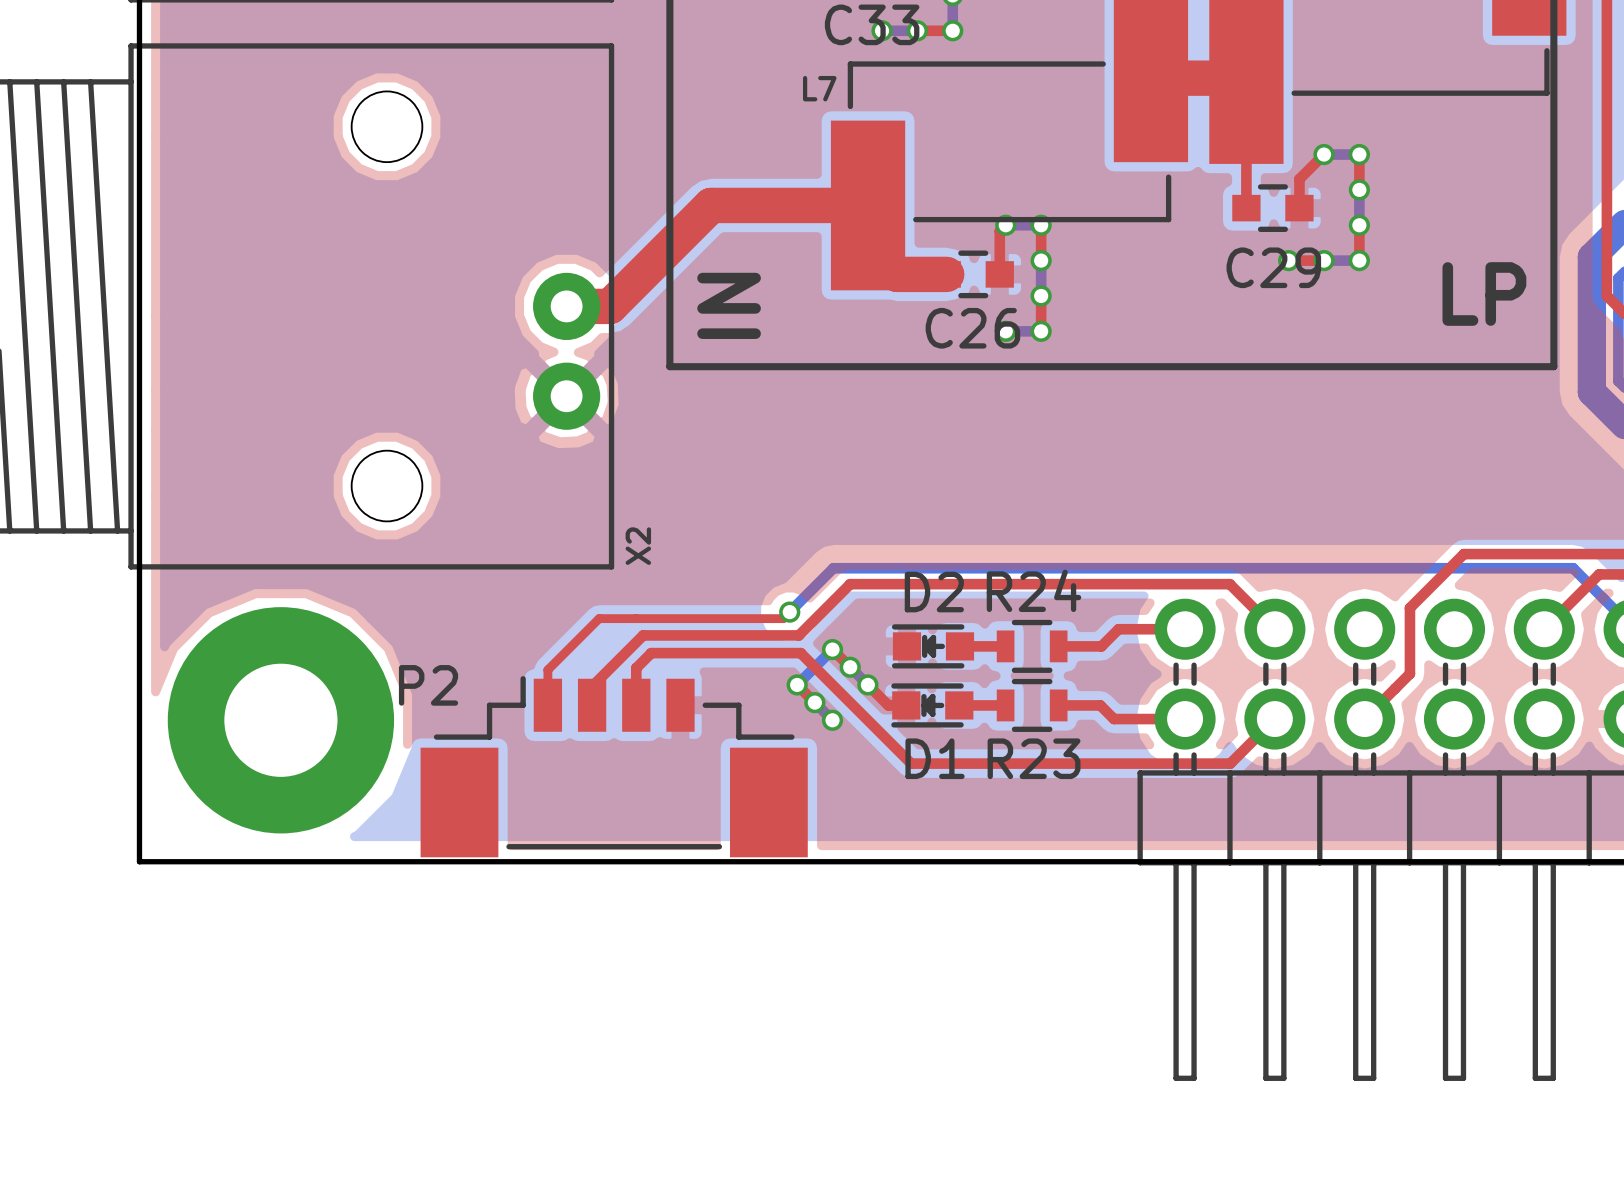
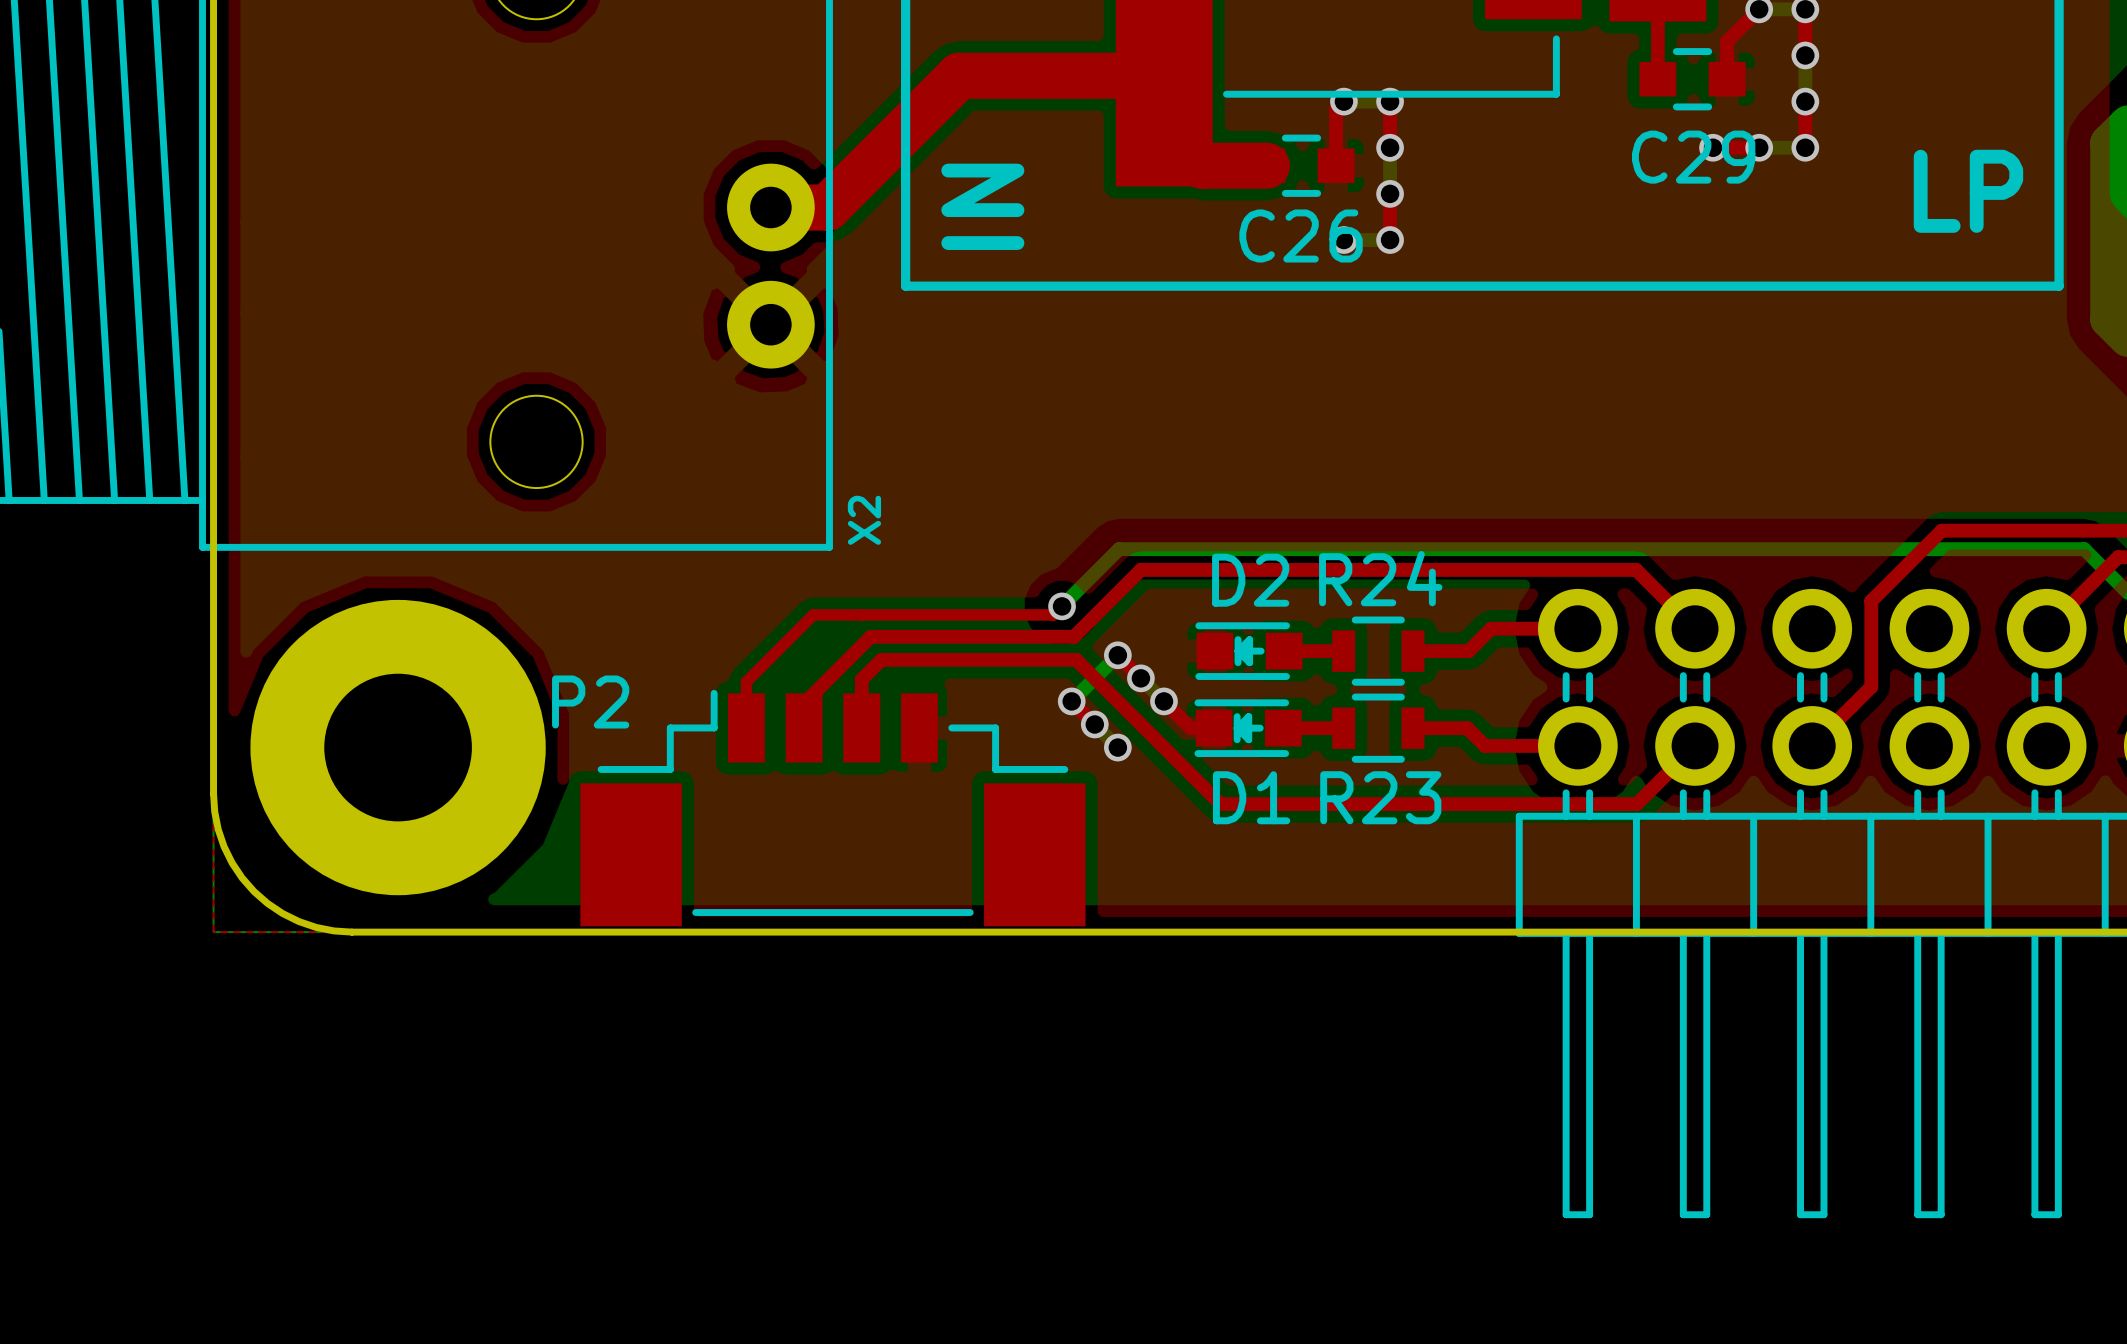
board edge: (139, 755) (139, 861) (245, 861) -> (213, 793) (218, 829) (224, 846) (242, 877) (254, 891) (267, 903) (298, 921) (316, 927) (351, 932)

